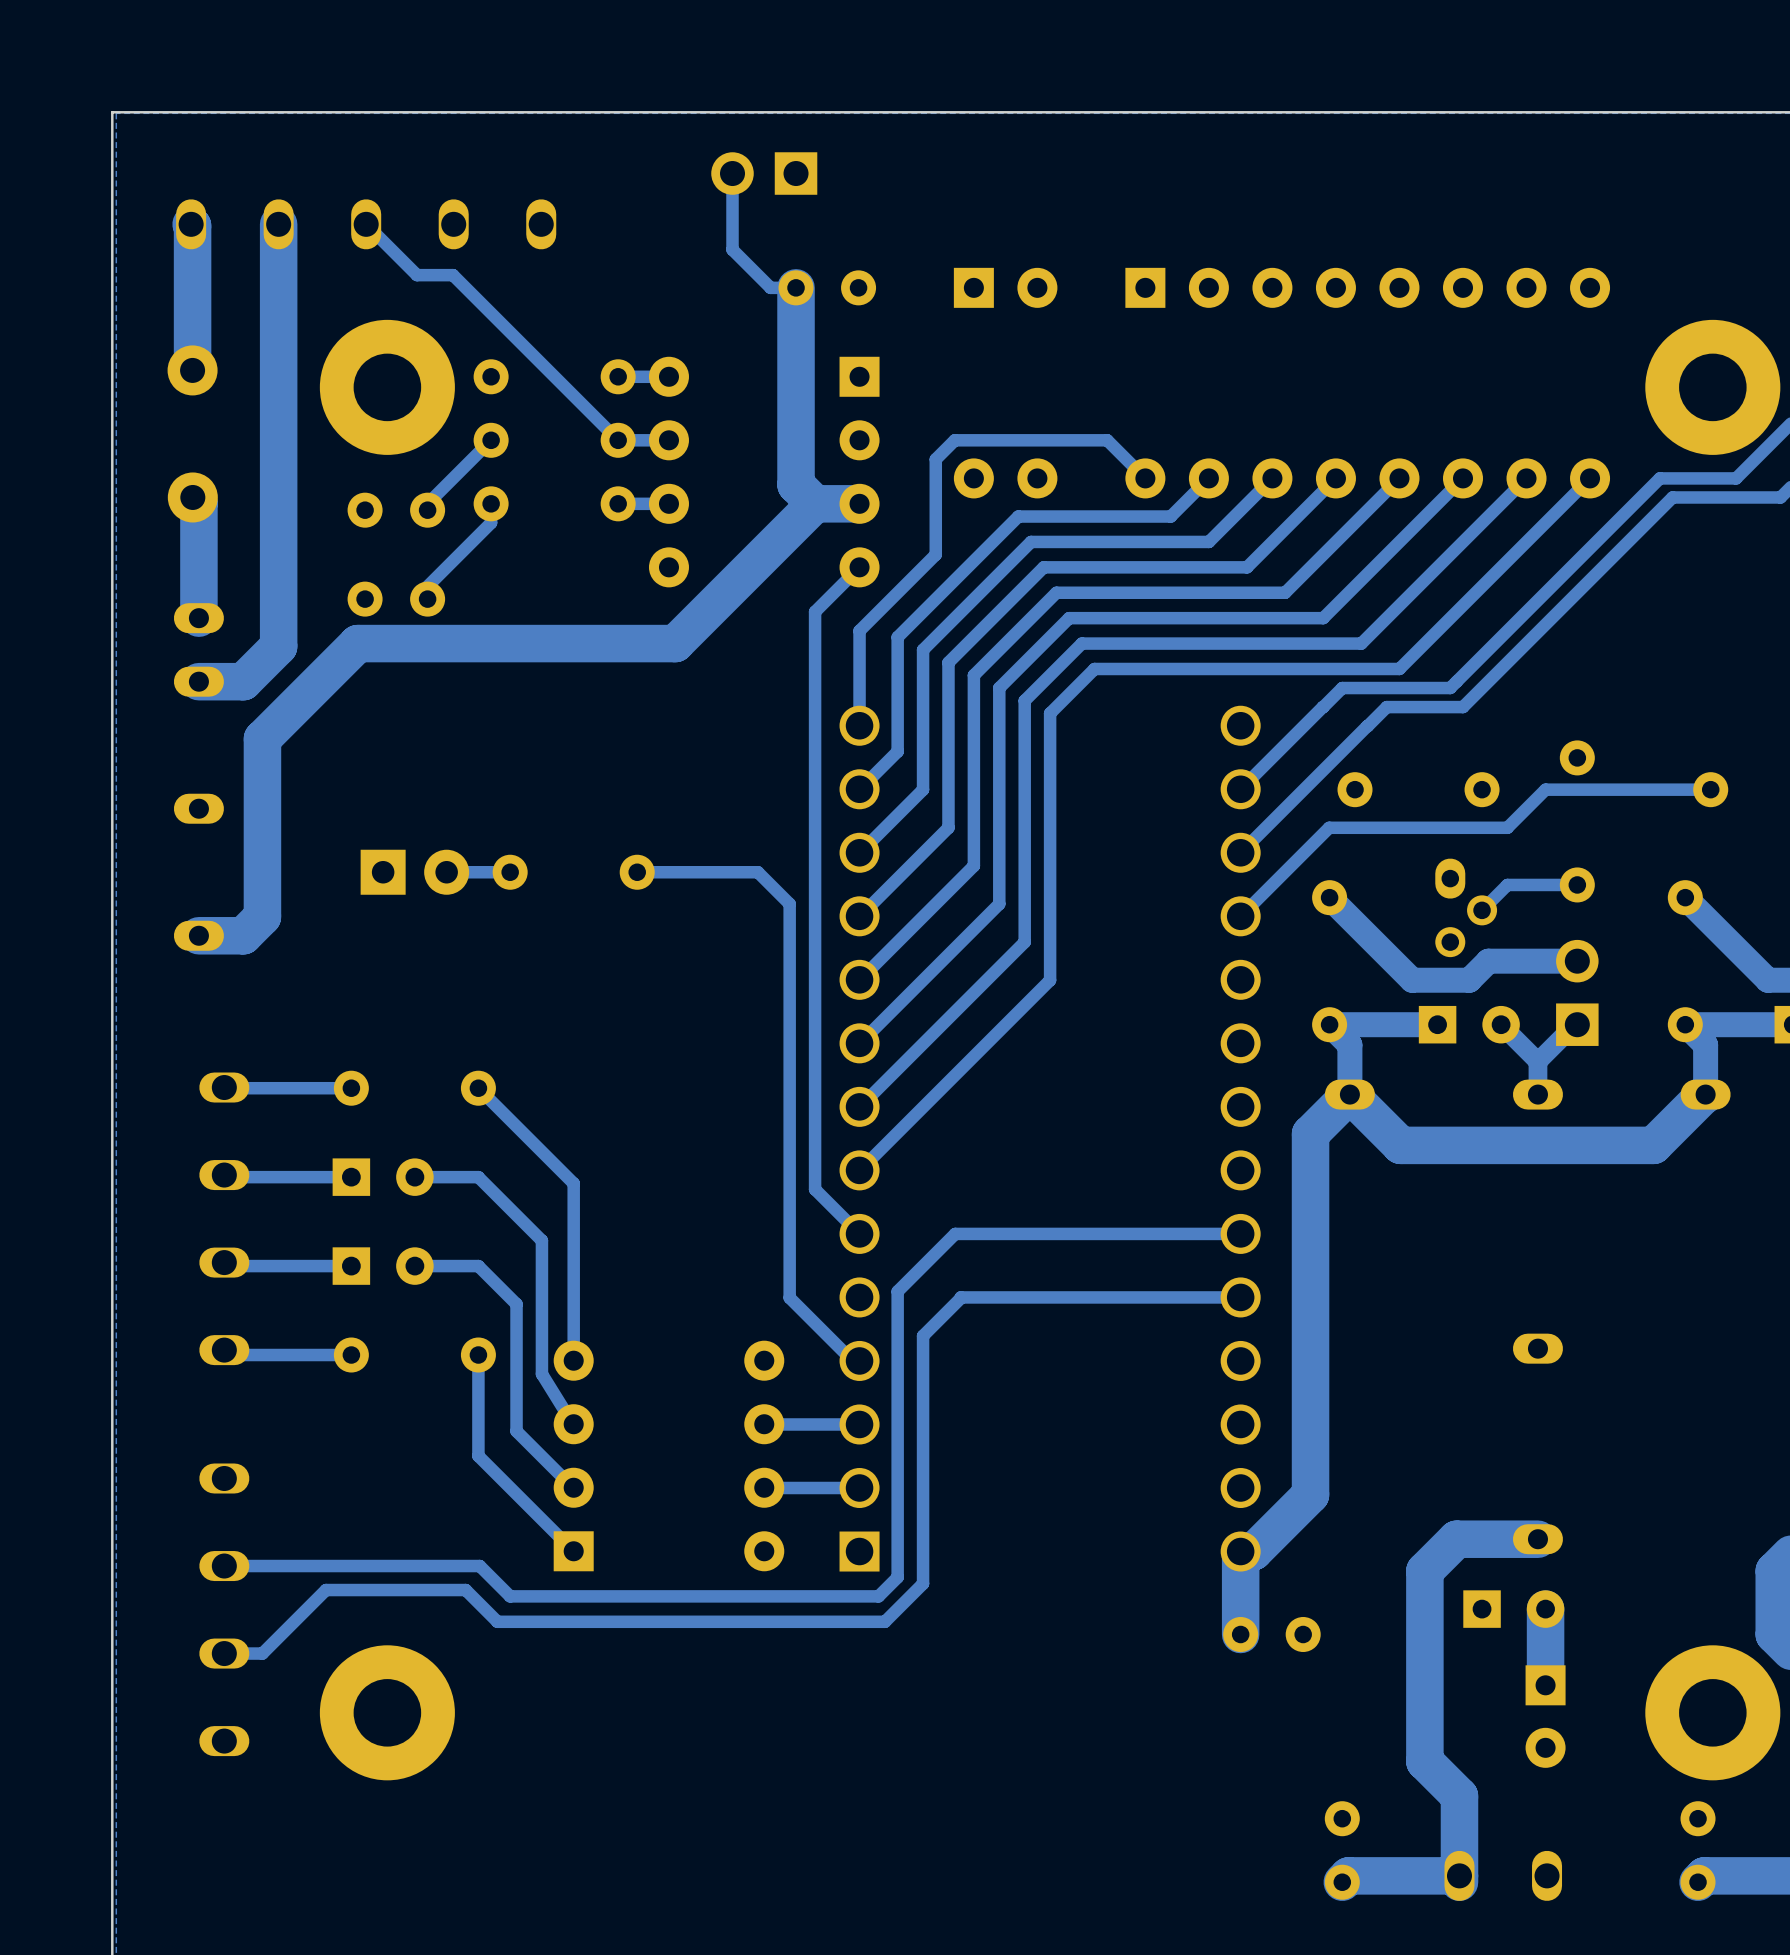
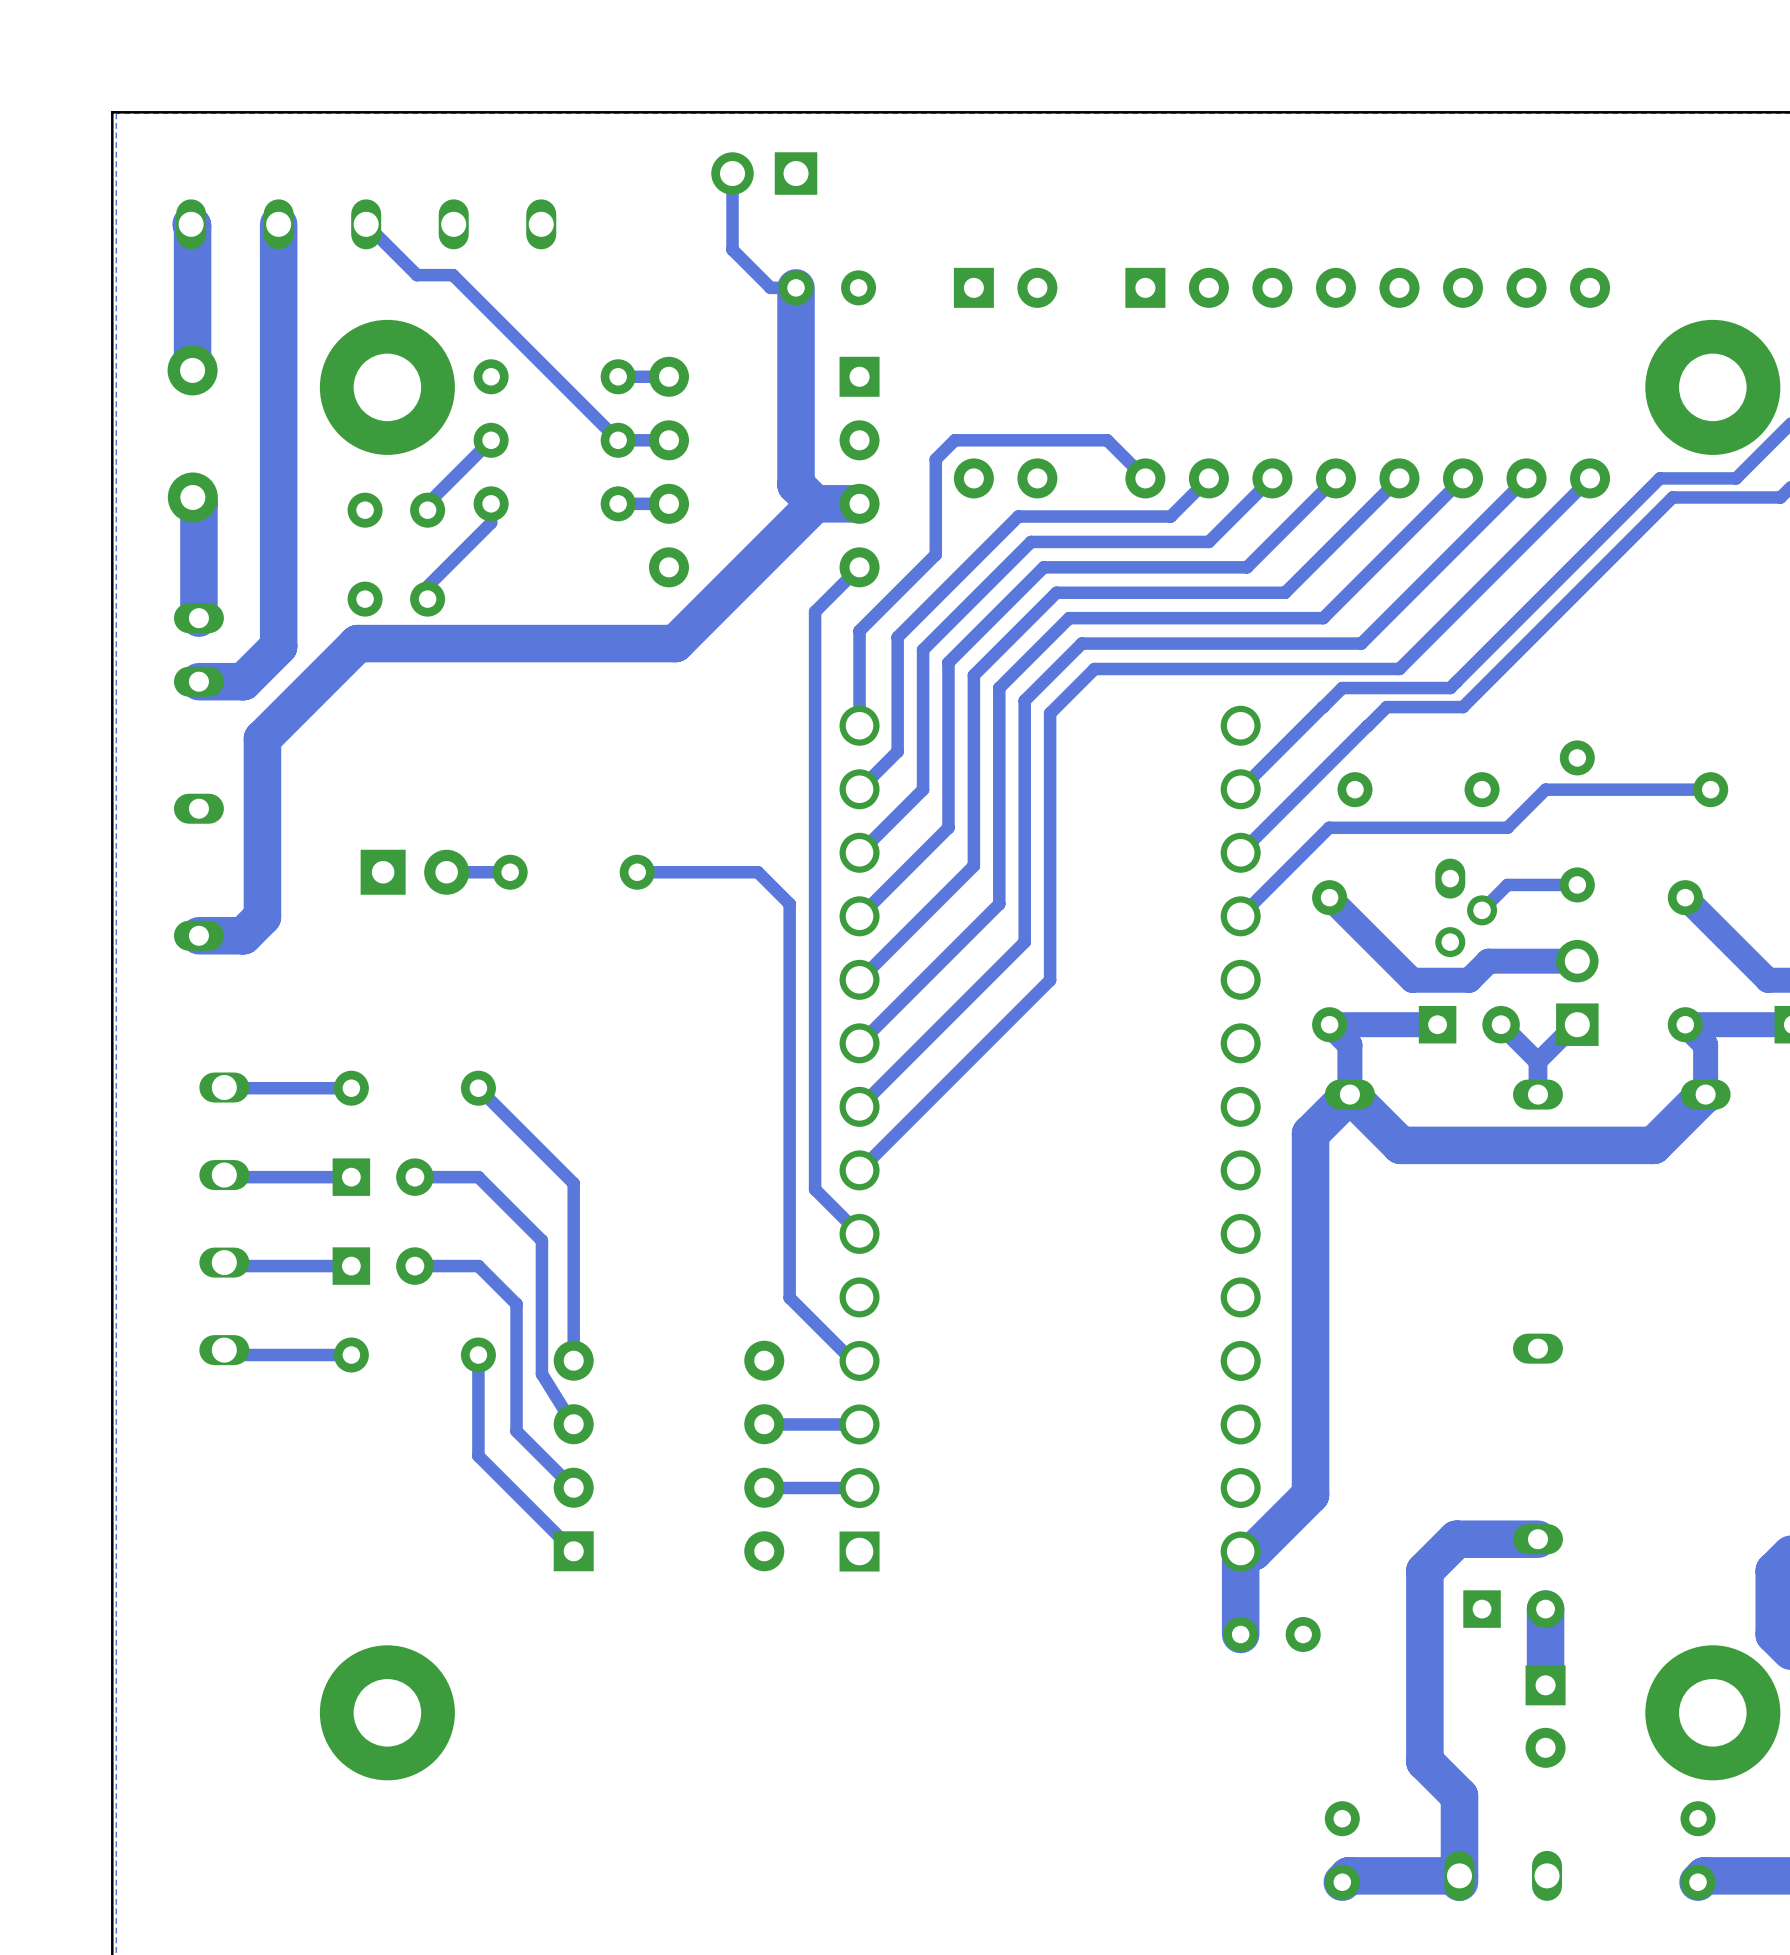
track: (1240, 1233) (955, 1233) (897, 1291) (897, 1577) (878, 1596) (510, 1596) (479, 1566) (224, 1566) -> none
track: (1240, 1297) (960, 1297) (923, 1335) (923, 1583) (884, 1621) (497, 1621) (465, 1590) (325, 1590) (262, 1653) (224, 1653) -> none
part: (224, 1609) -> none

